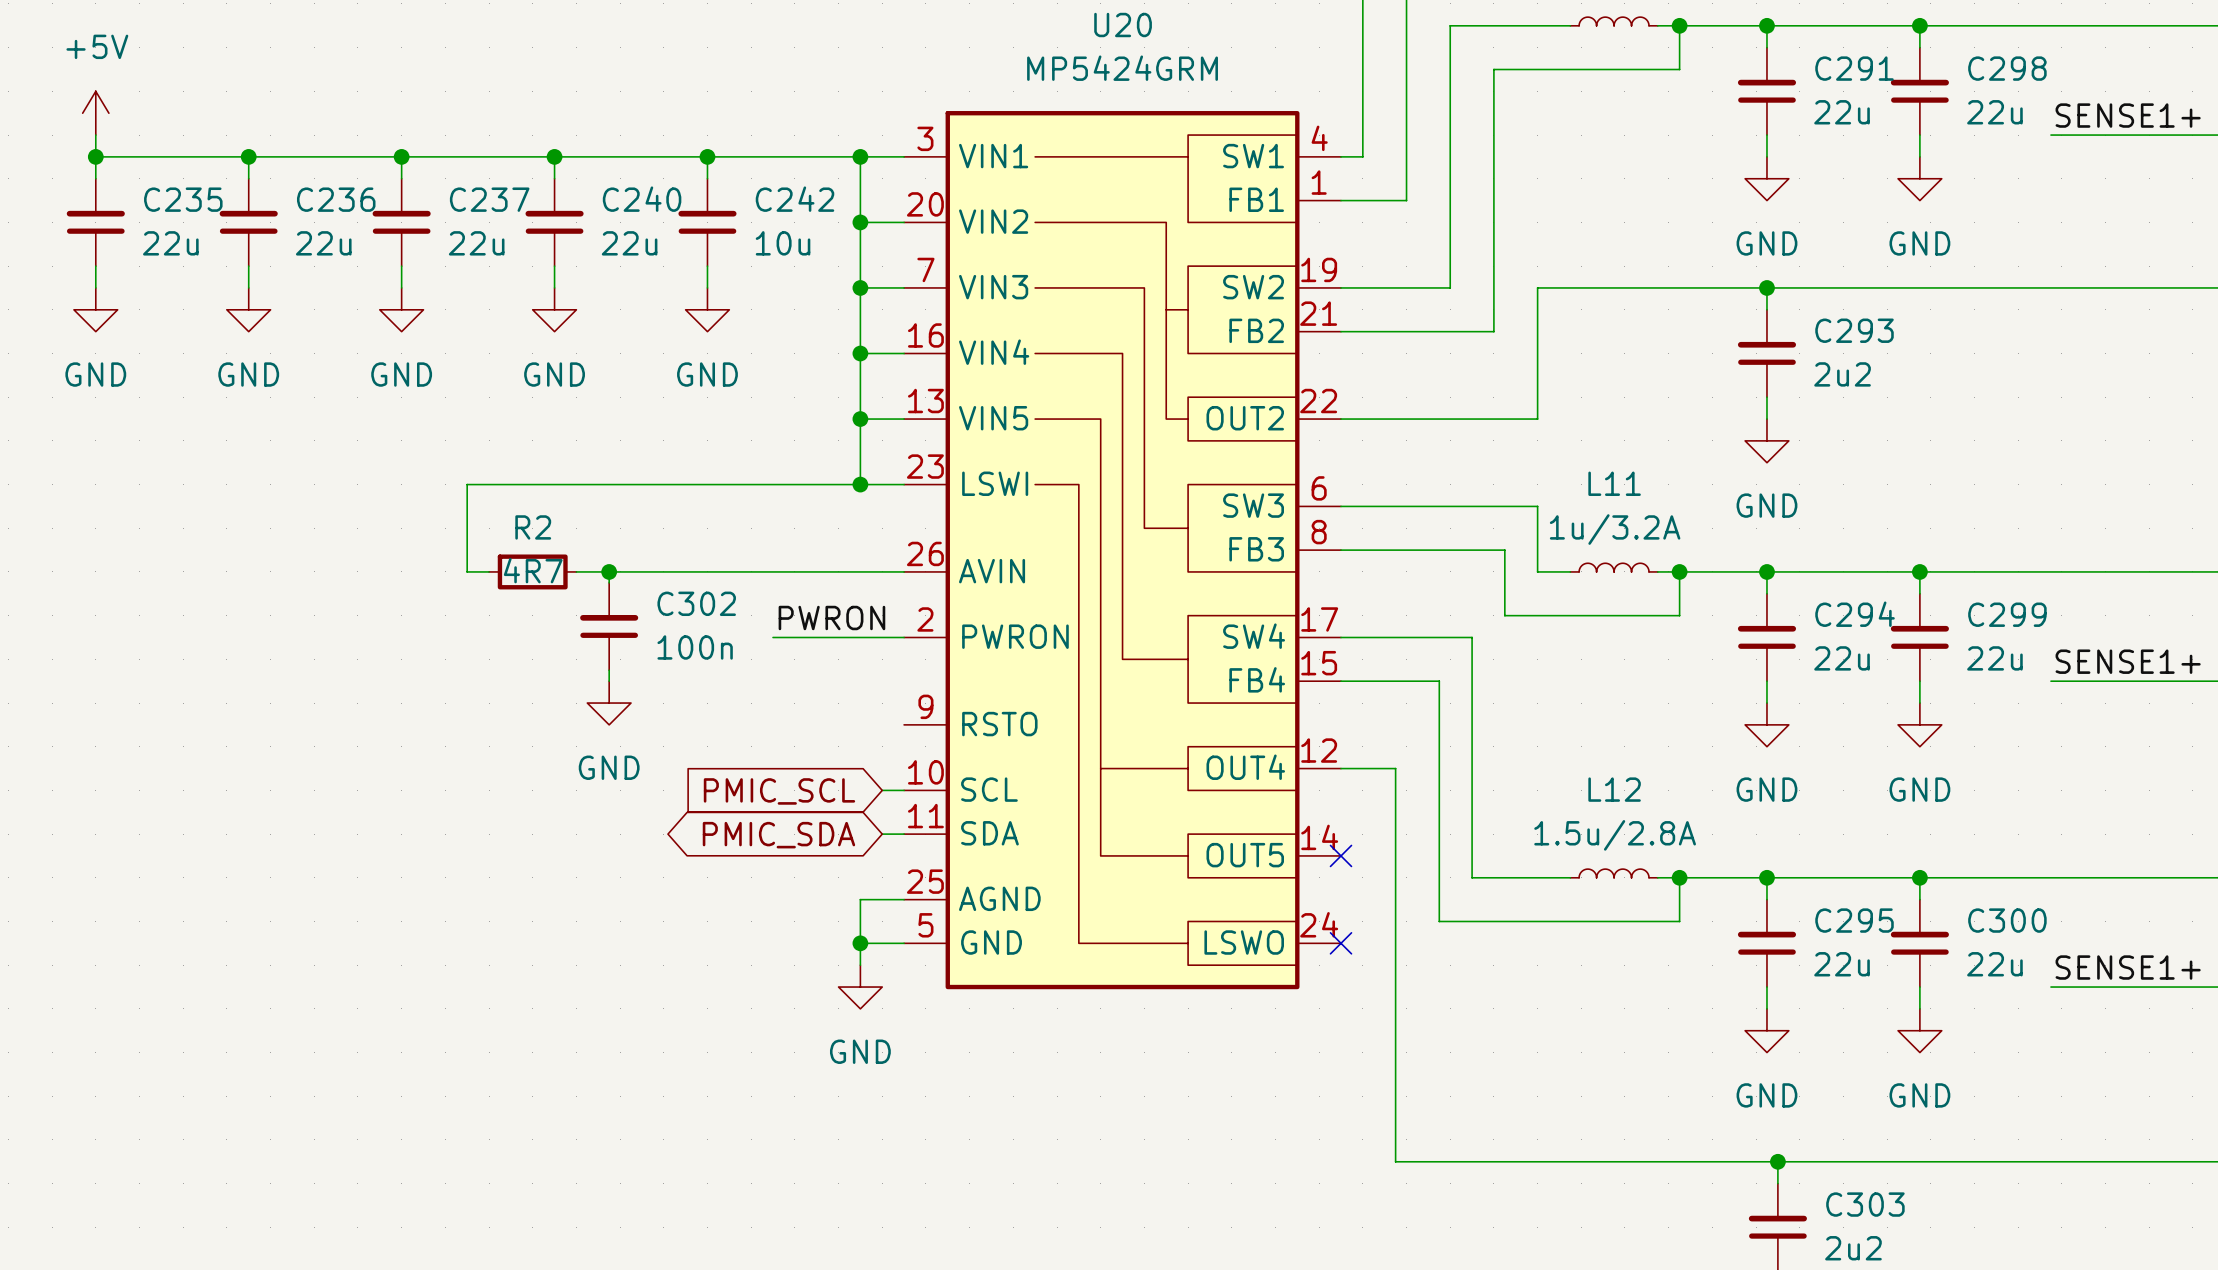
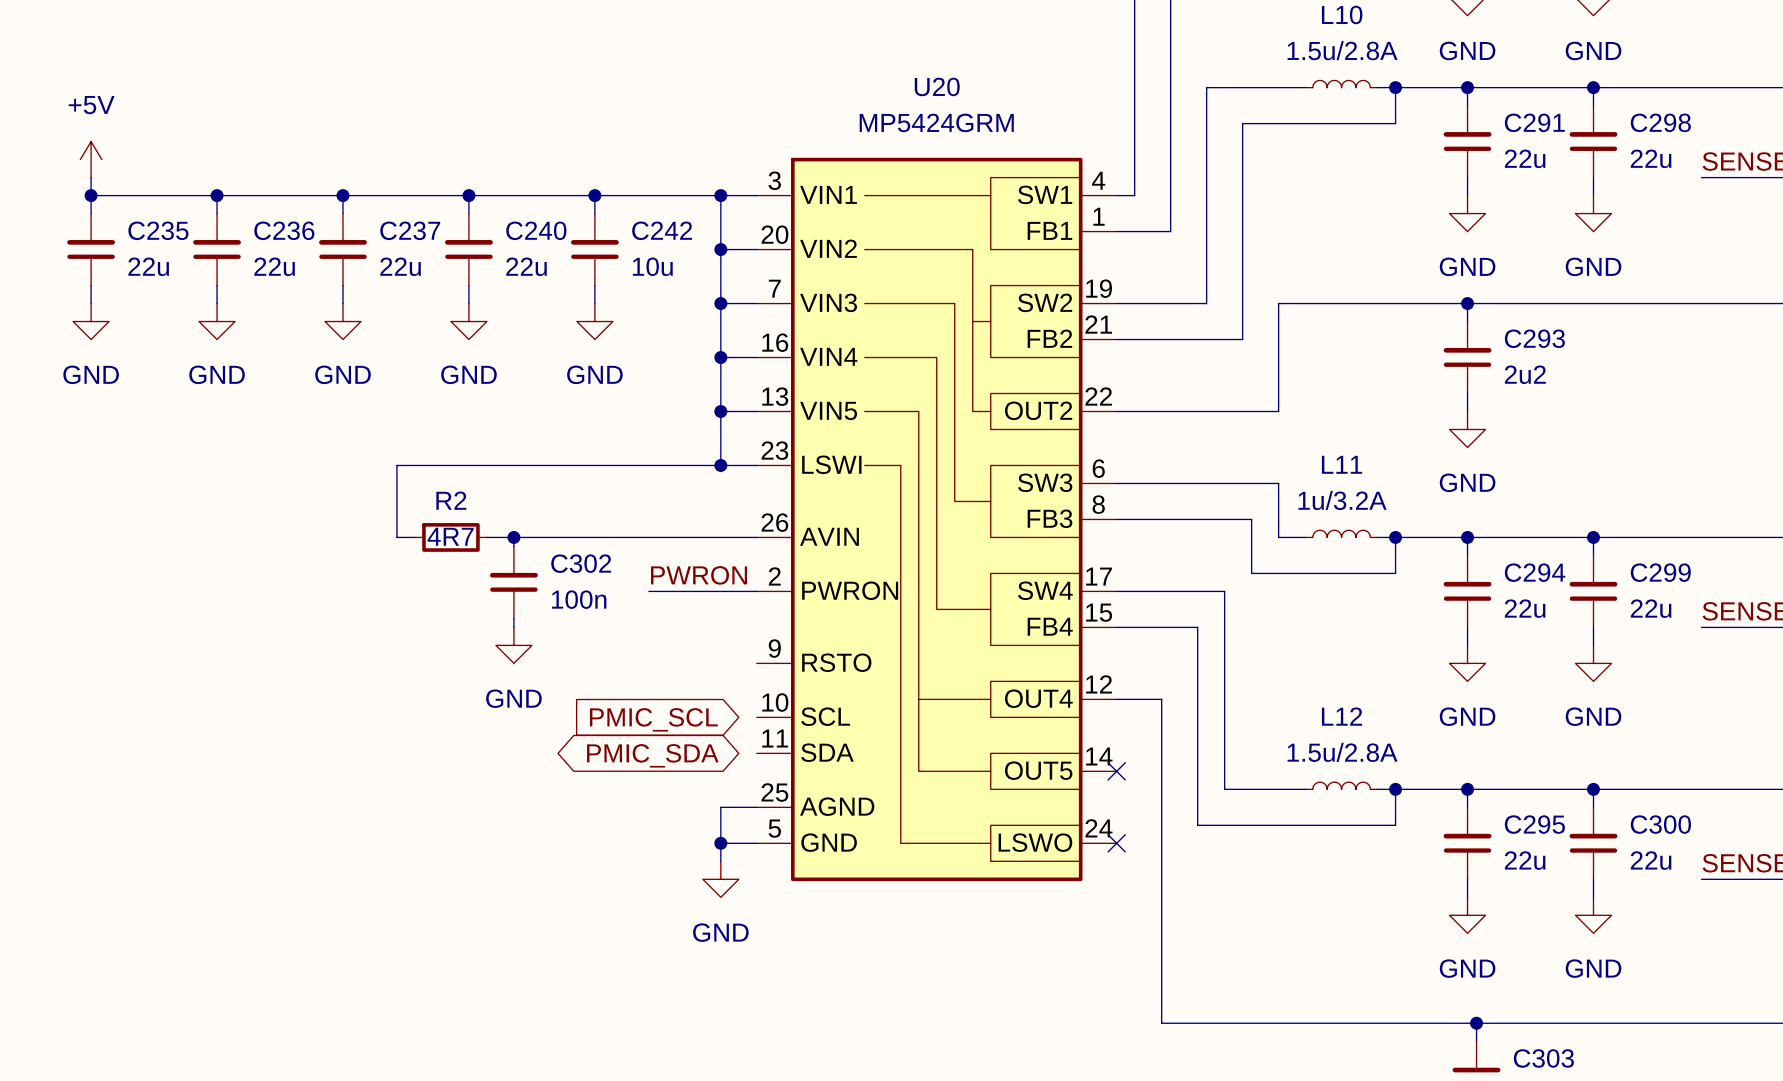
wire: (882, 790) (904, 790) -> none
wire: (882, 834) (904, 834) -> none

